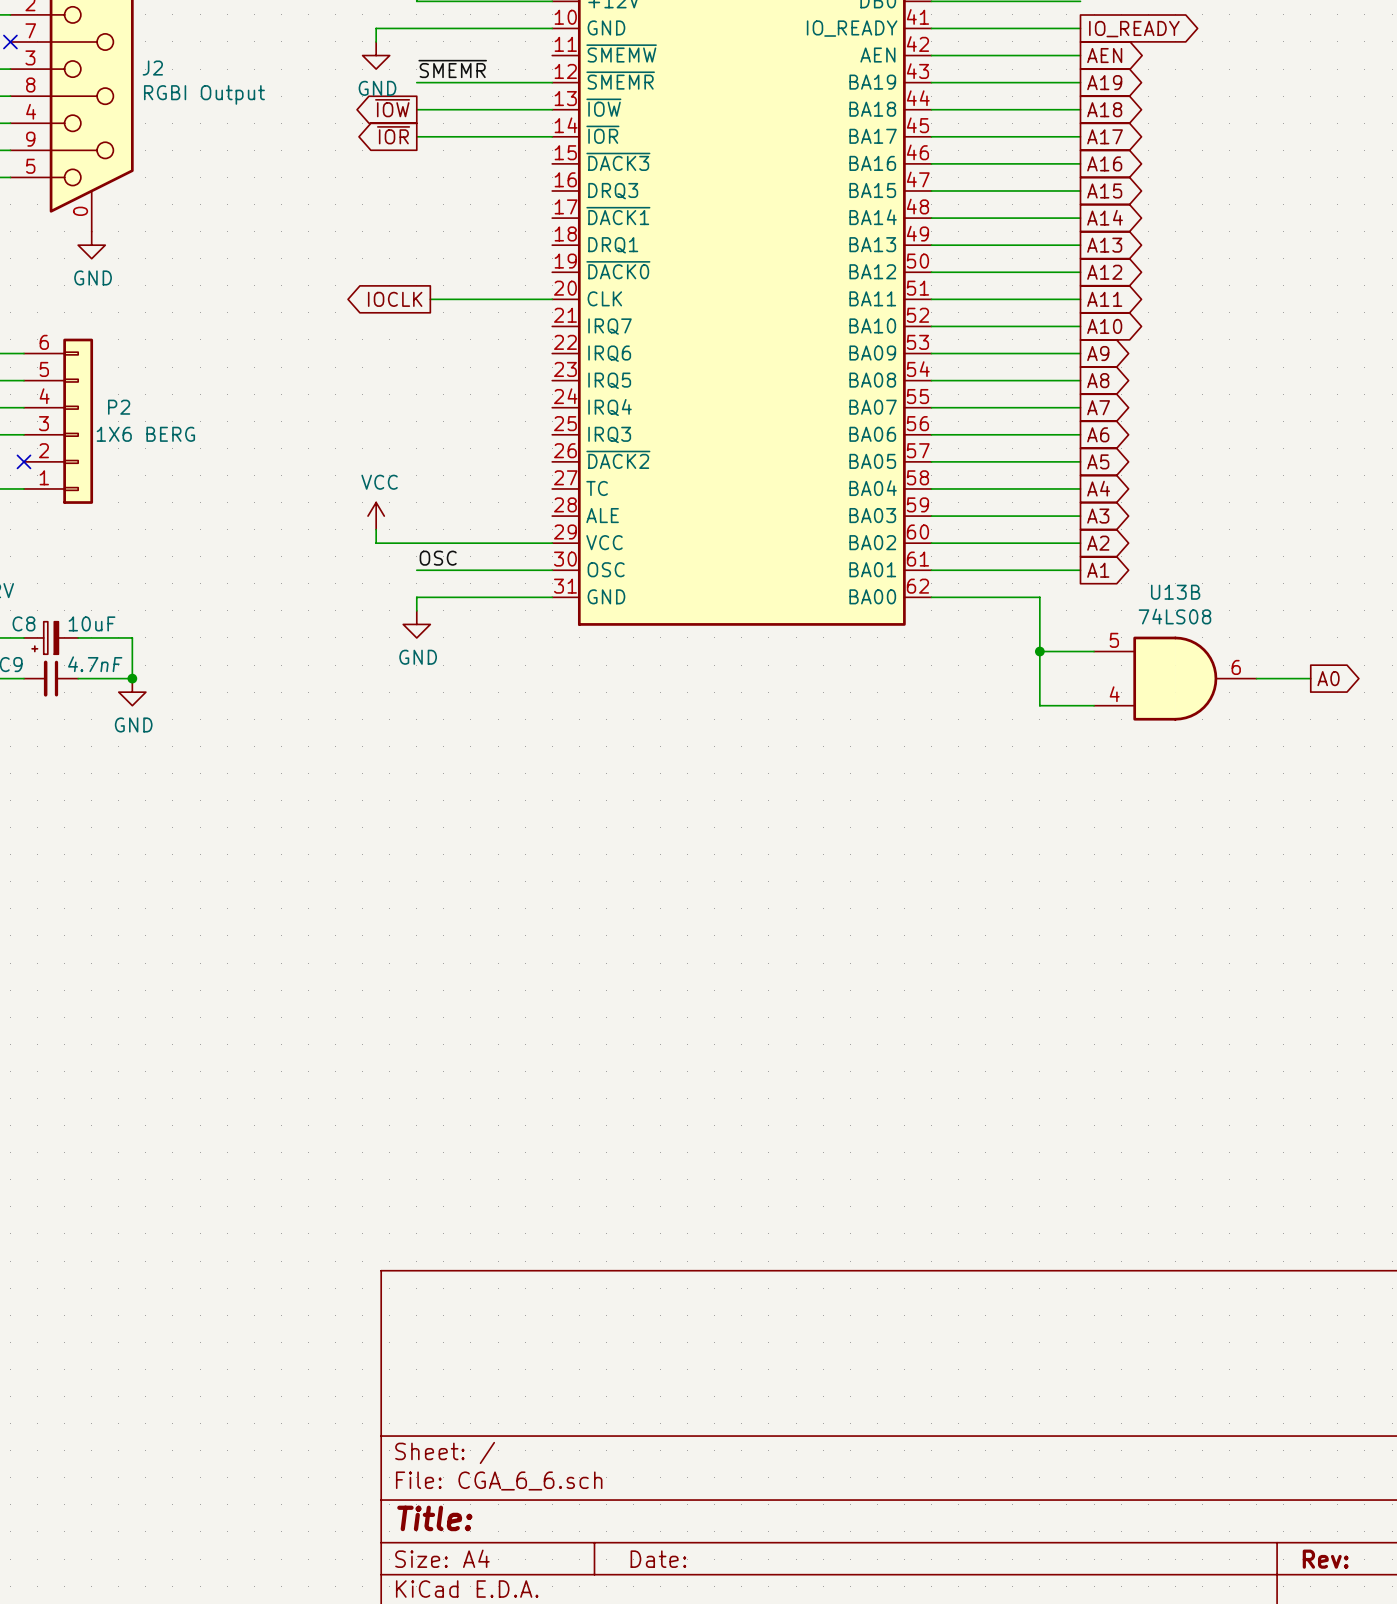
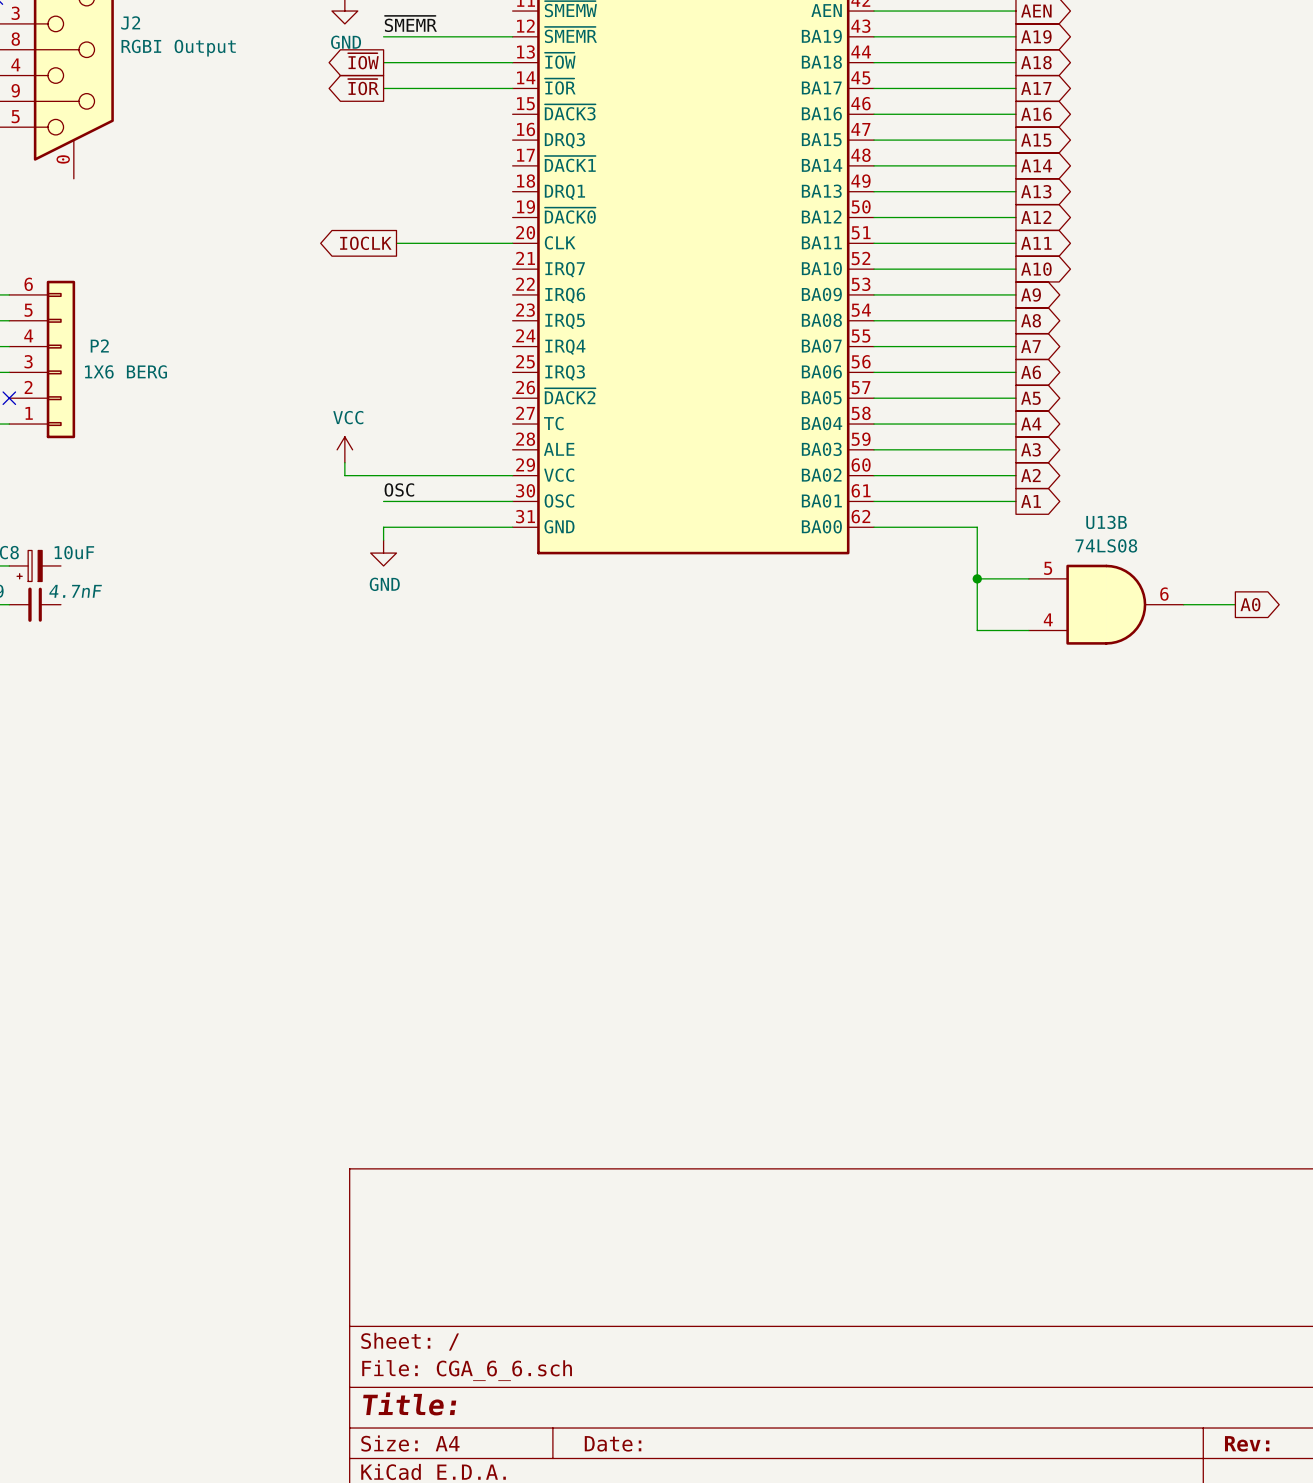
power symbol: GND (91, 245) -> none
wire: (78, 637) (132, 637) (132, 678) (78, 678) -> none
junction: (132, 678) -> none
power symbol: GND (132, 692) -> none

